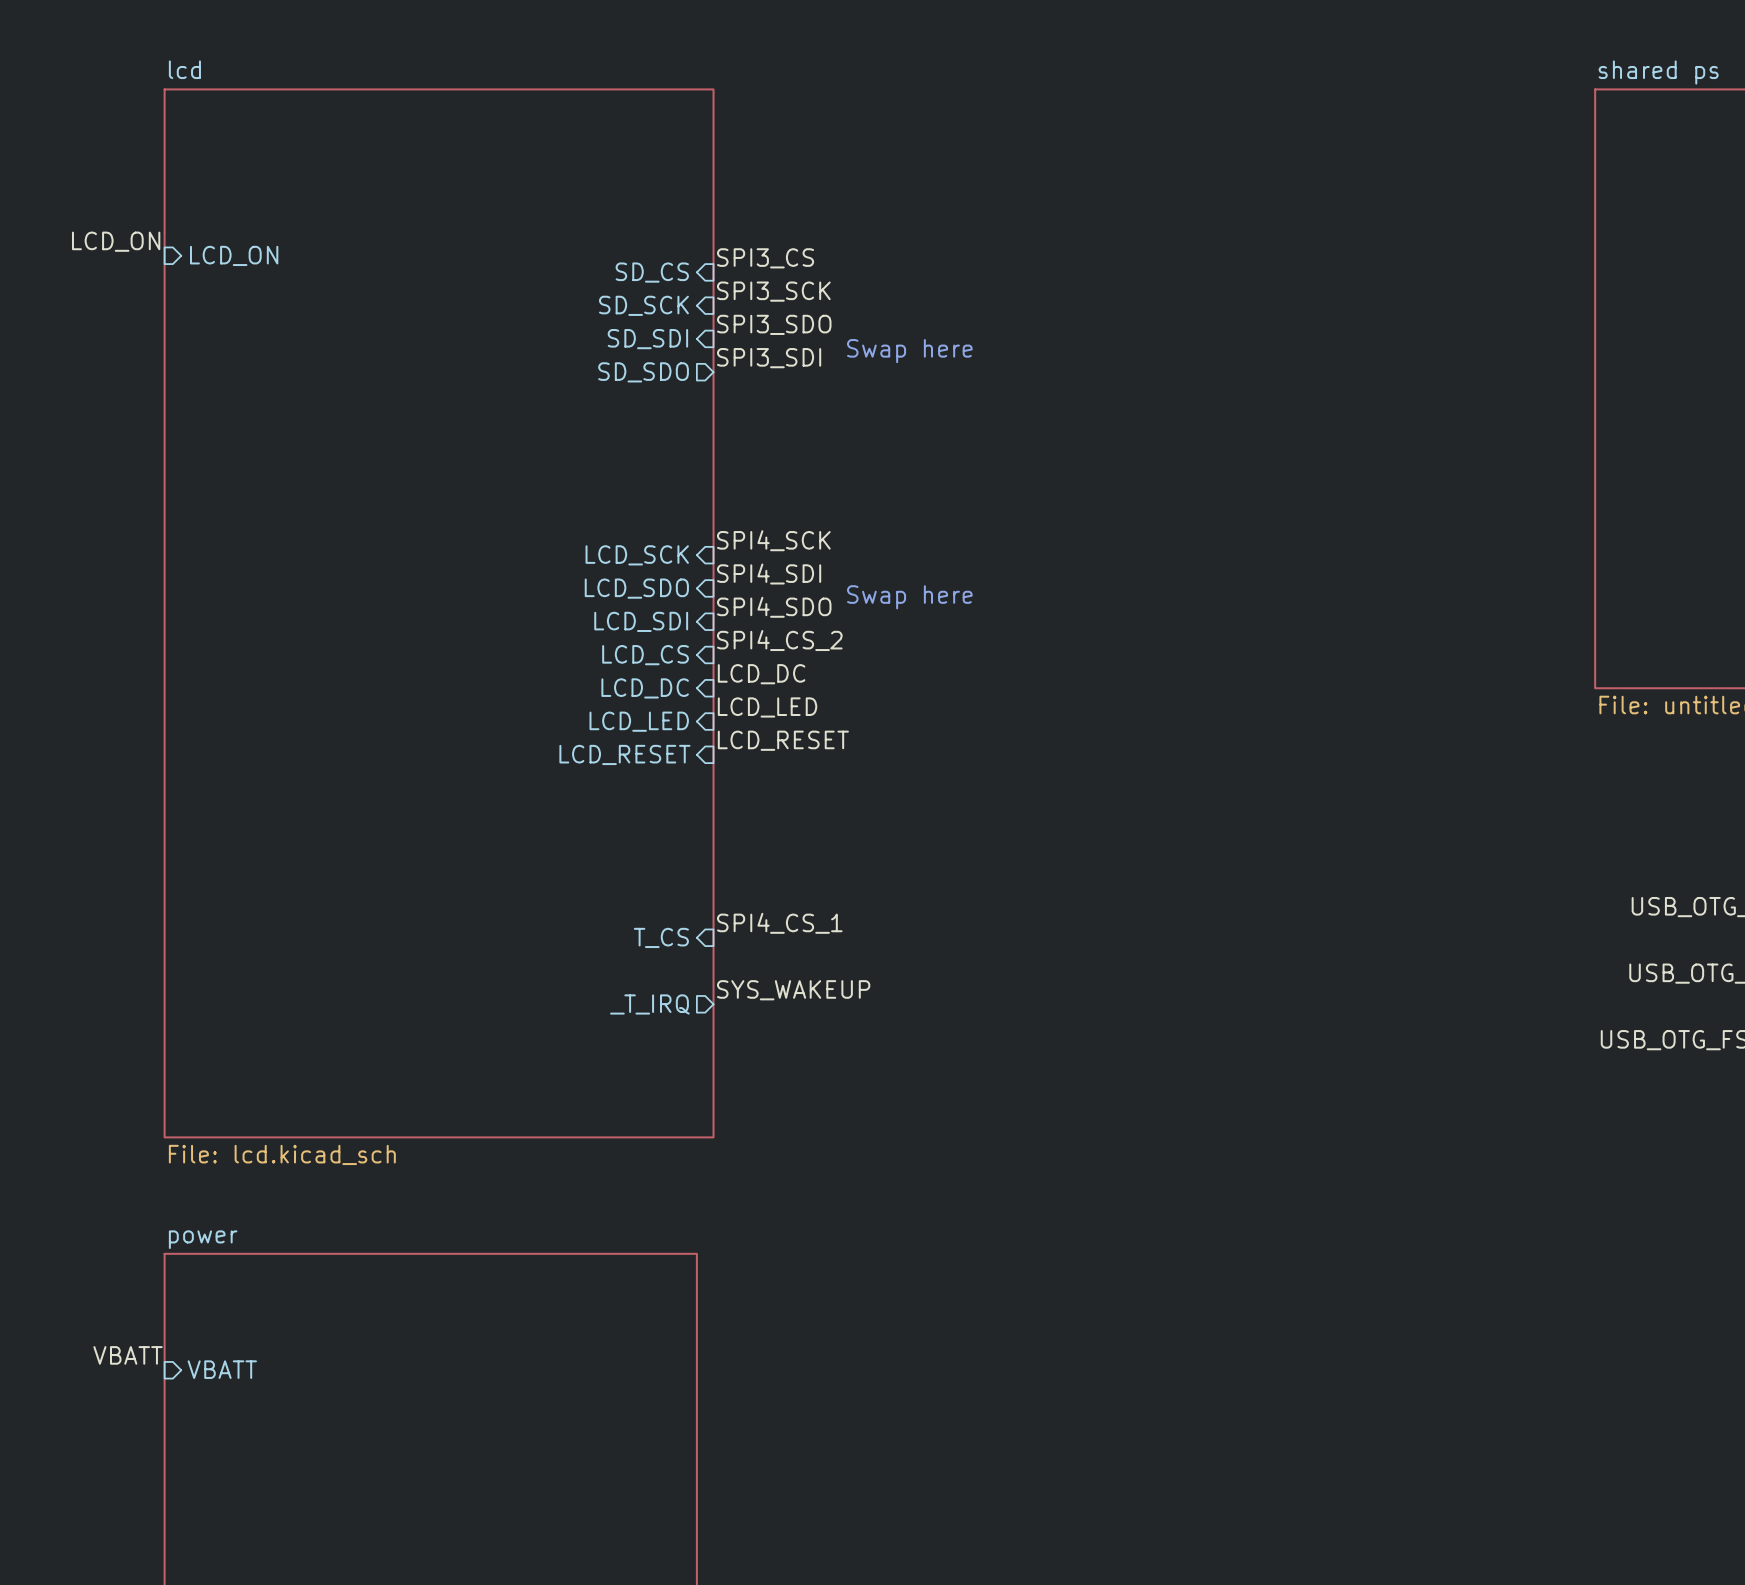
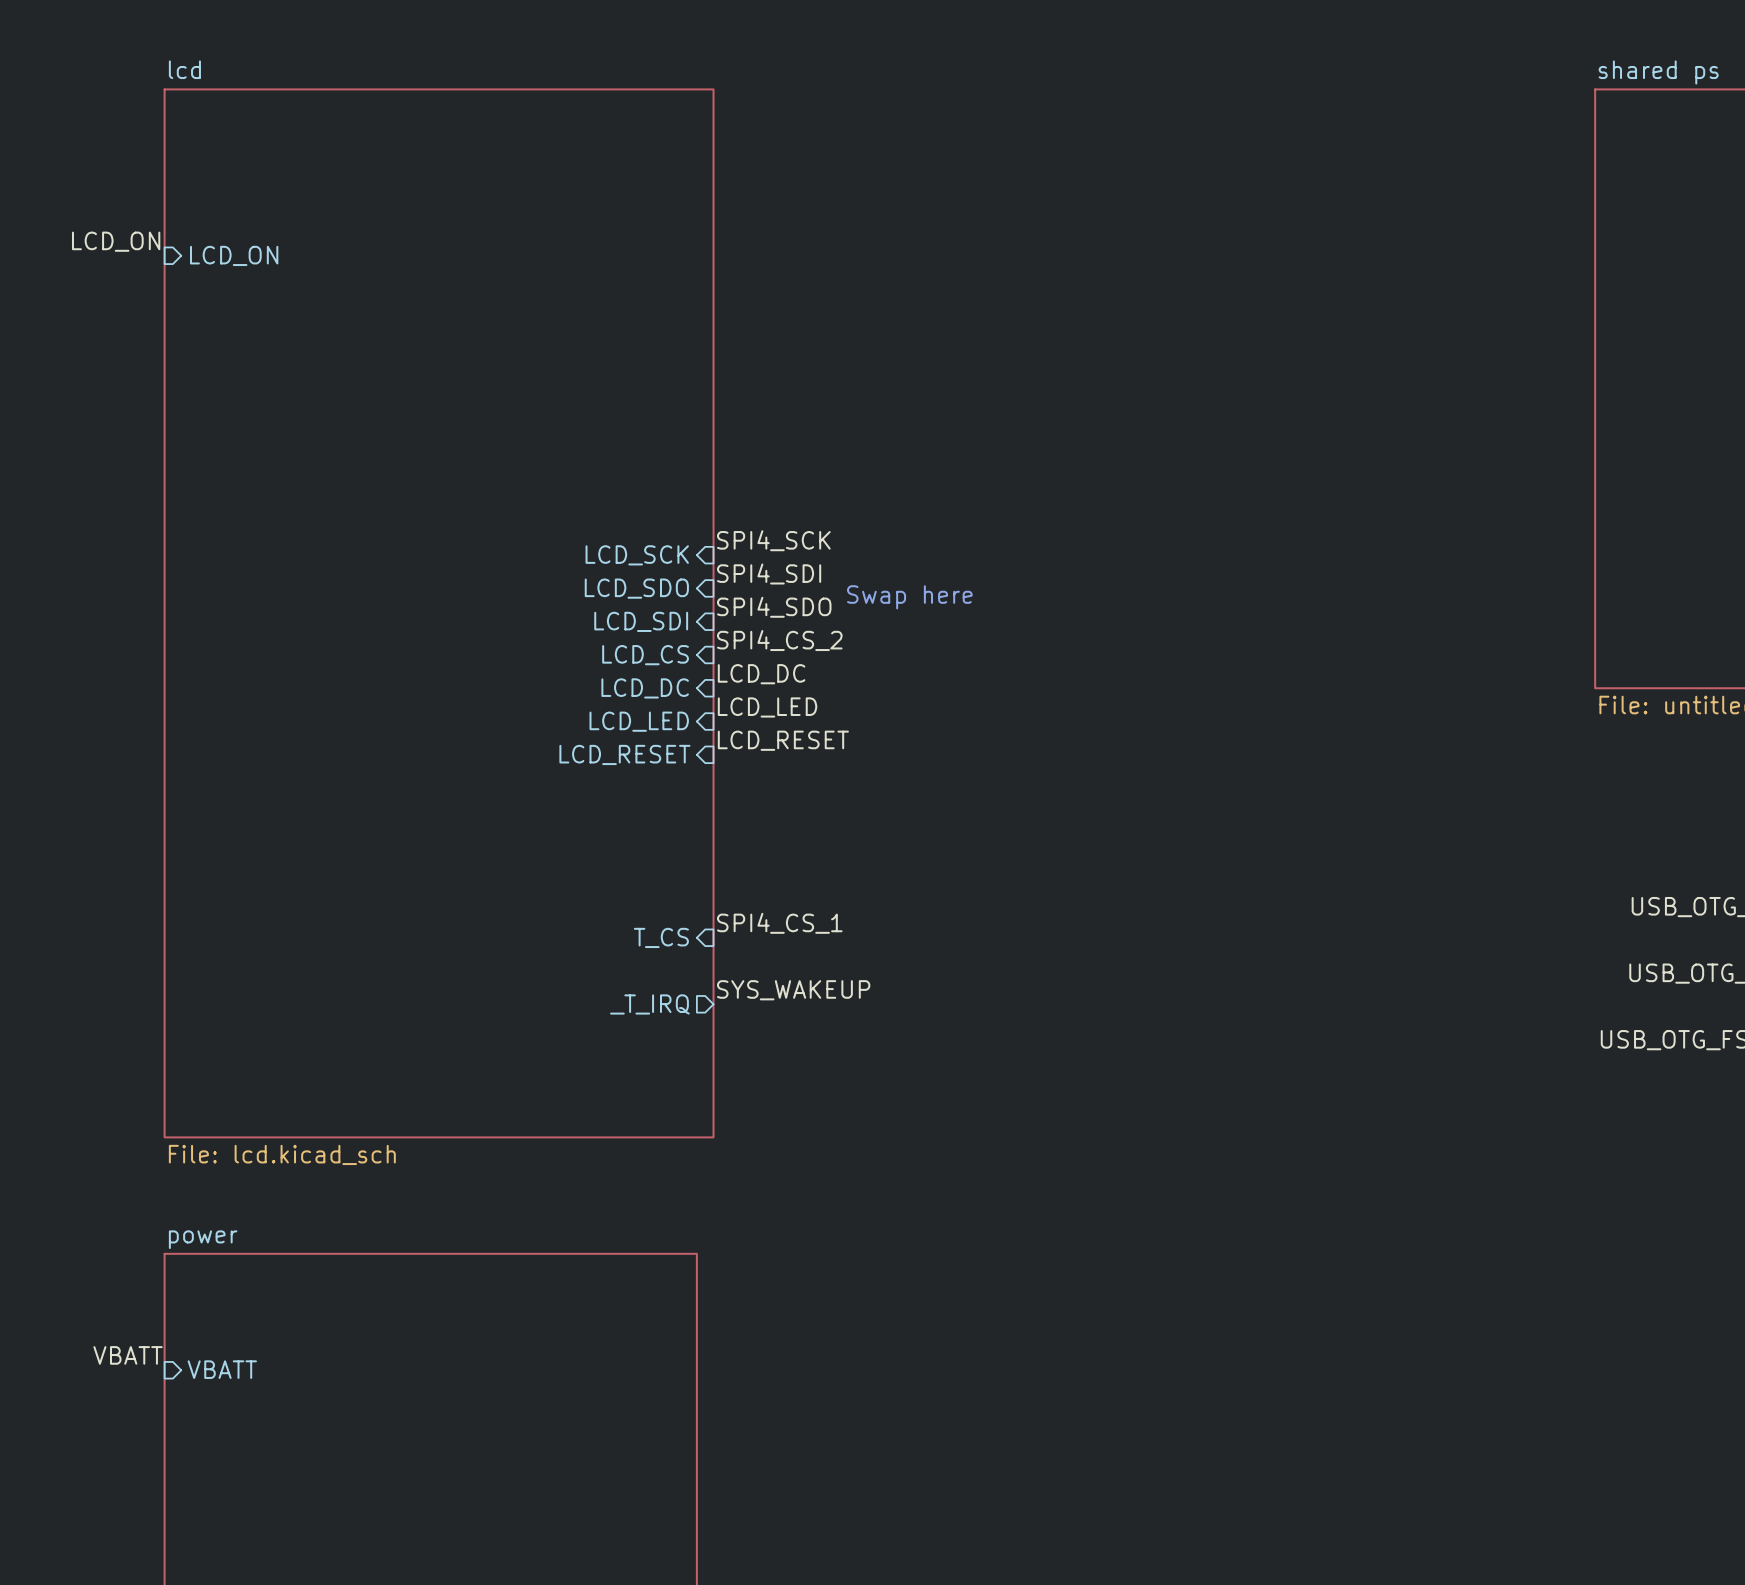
label: SPI3_CS (765, 258) -> none
sheet pin: SD_CS (652, 272) -> none
label: SPI3_SCK (773, 291) -> none
sheet pin: SD_SCK (643, 305) -> none
label: SPI3_SDO (774, 324) -> none
sheet pin: SD_SDI (647, 339) -> none
text: Swap here (909, 351) -> none
label: SPI3_SDI (769, 358) -> none
sheet pin: SD_SDO (643, 372) -> none

